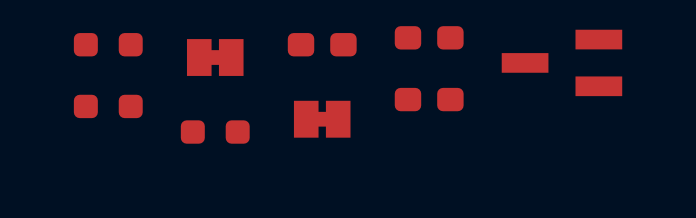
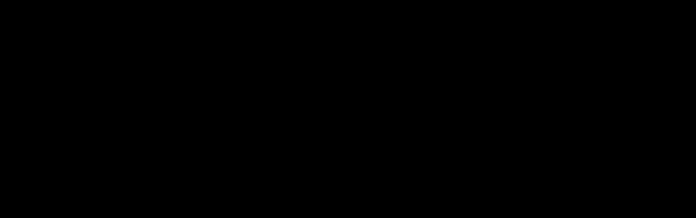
part: (429, 37) -> none
part: (108, 44) -> none
part: (322, 44) -> none
part: (215, 57) -> none
part: (561, 62) -> none
part: (429, 99) -> none
part: (108, 106) -> none
part: (322, 119) -> none
part: (215, 132) -> none

